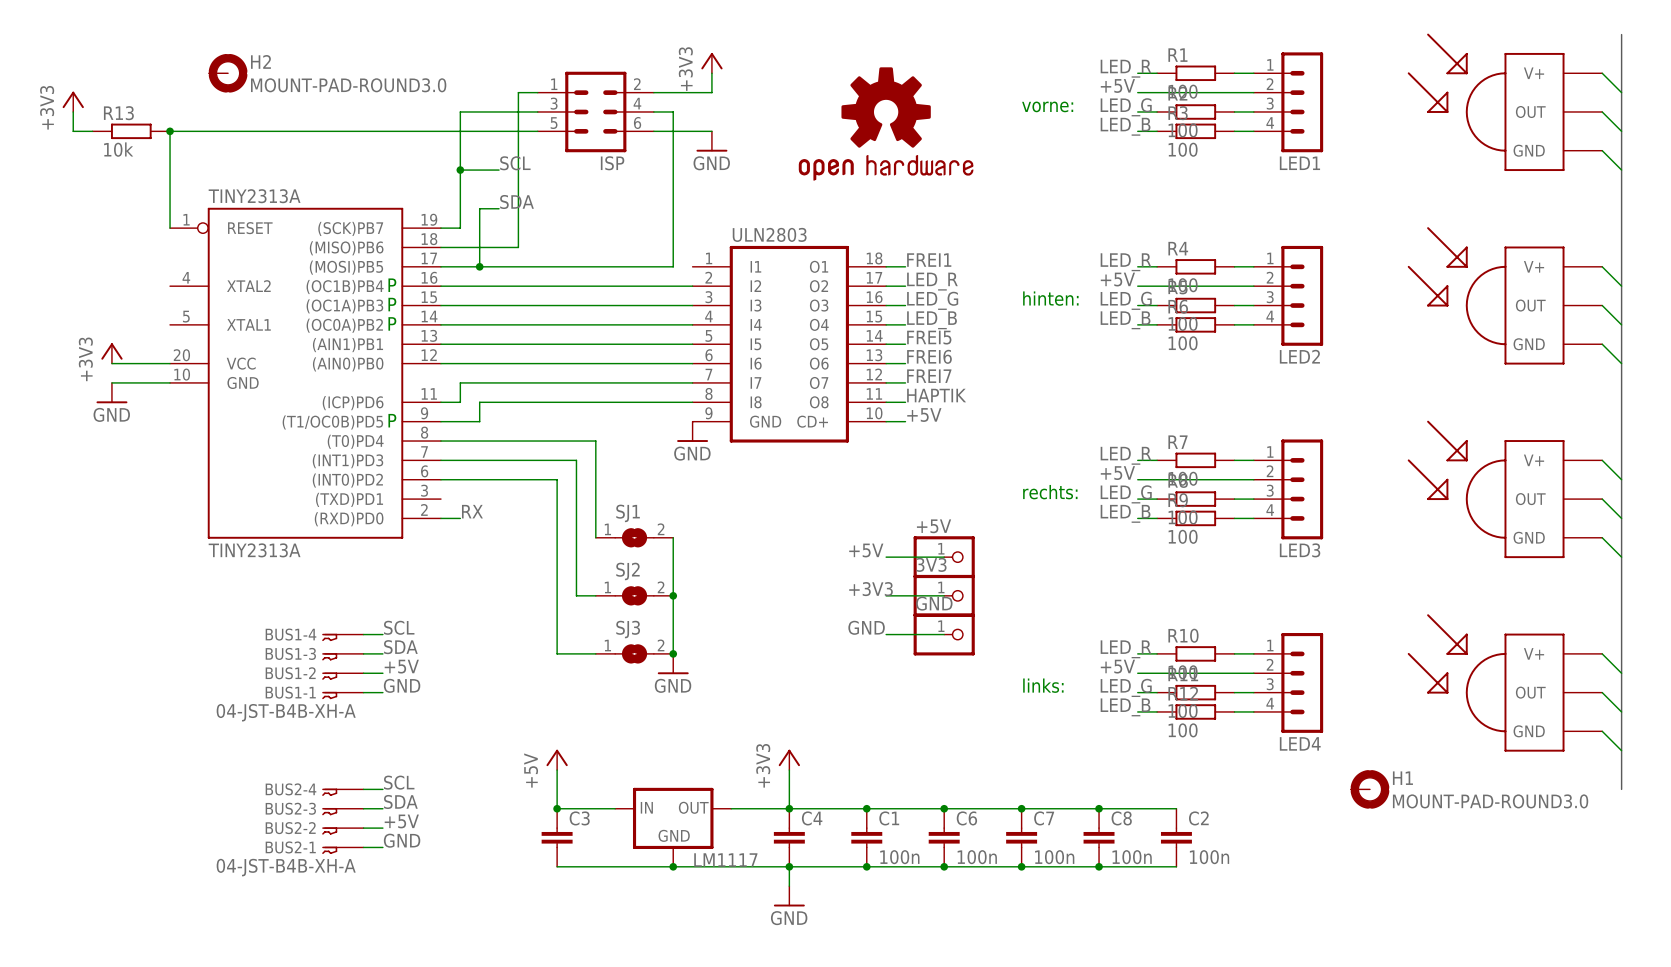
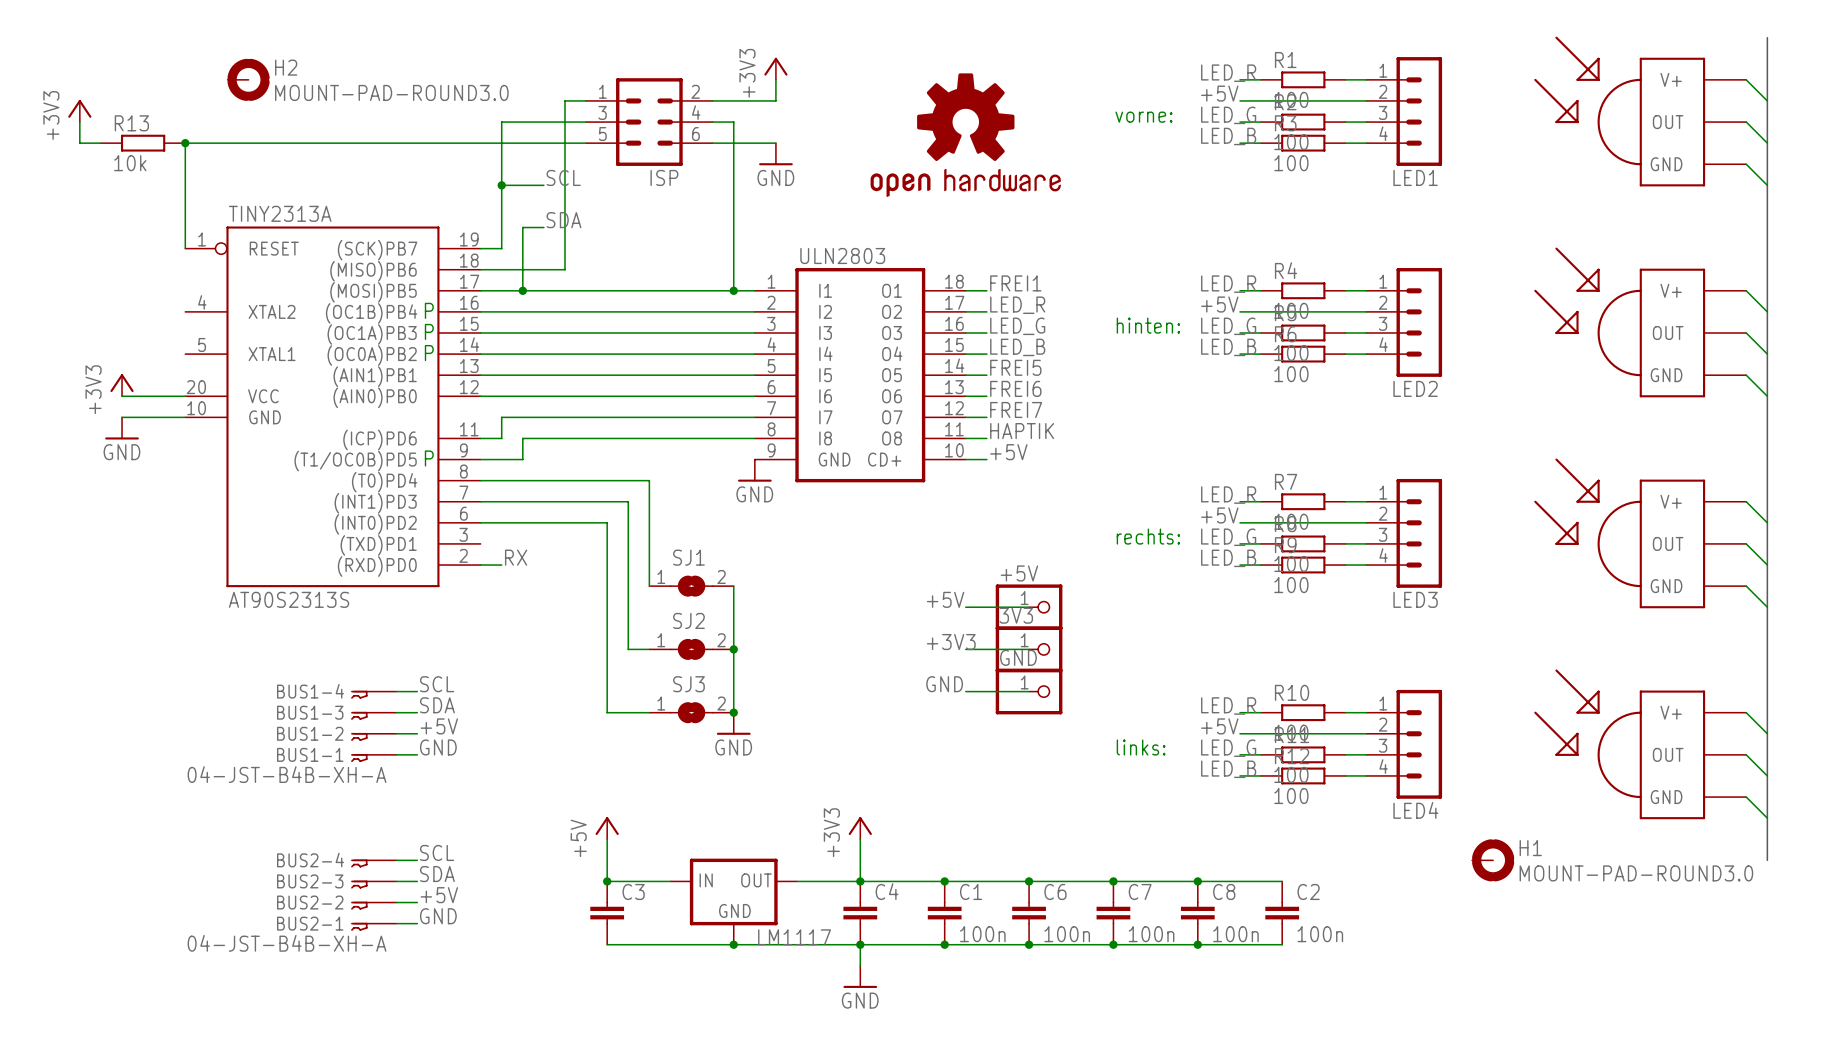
wire: none -> (733, 290) (754, 290)
junction: none -> (733, 290)
TINY2313A value: TINY2313A (254, 550) -> AT90S2313S (289, 599)

